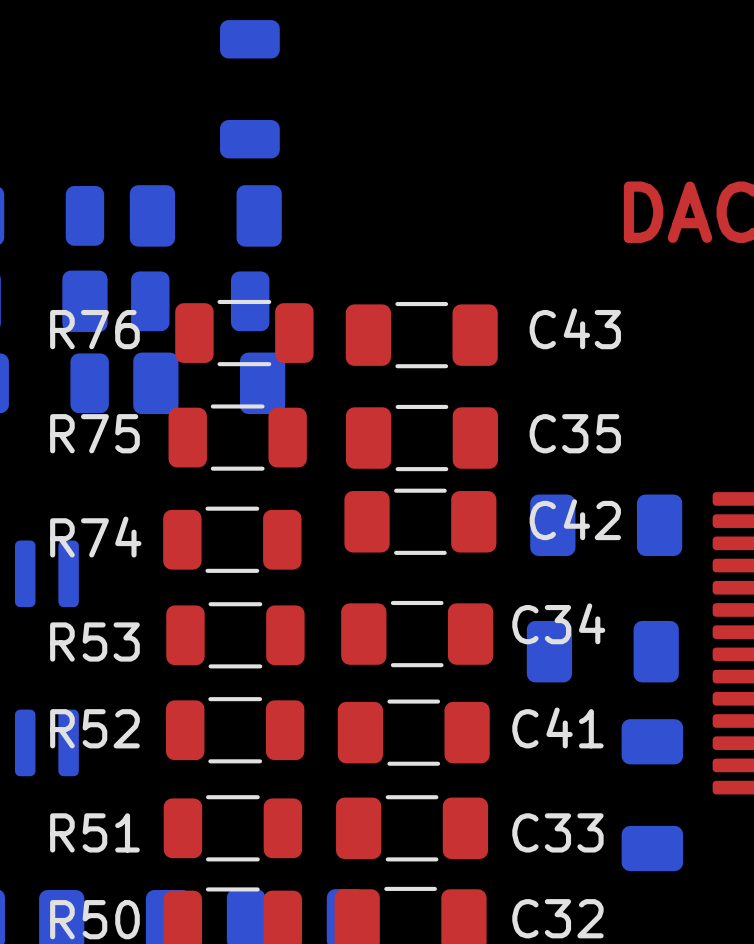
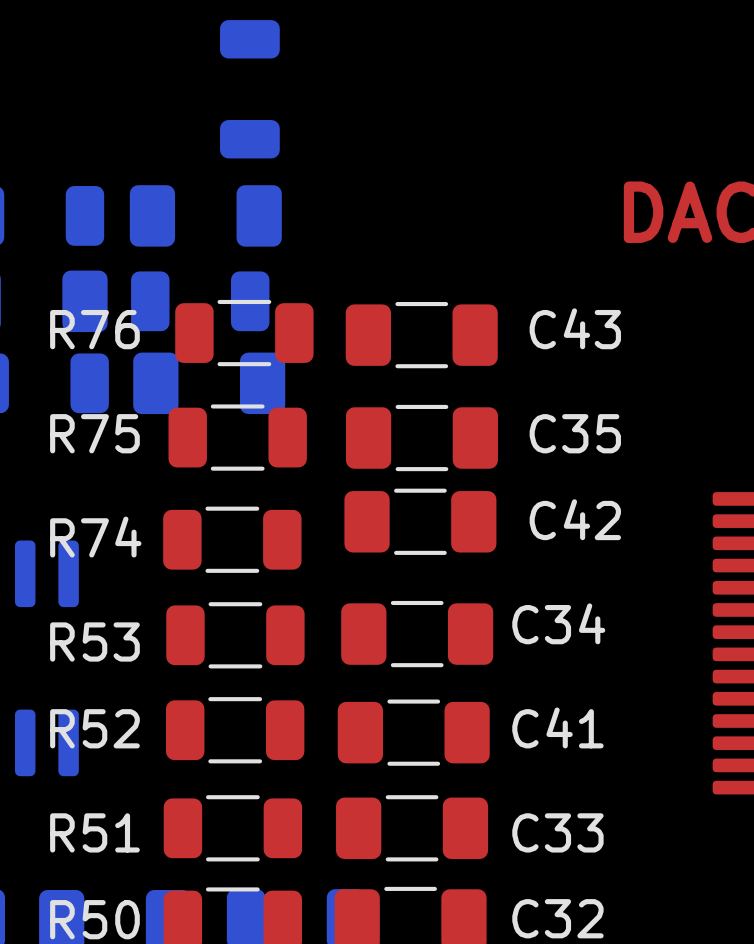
part: (606, 525) -> none
part: (602, 651) -> none
part: (652, 795) -> none

